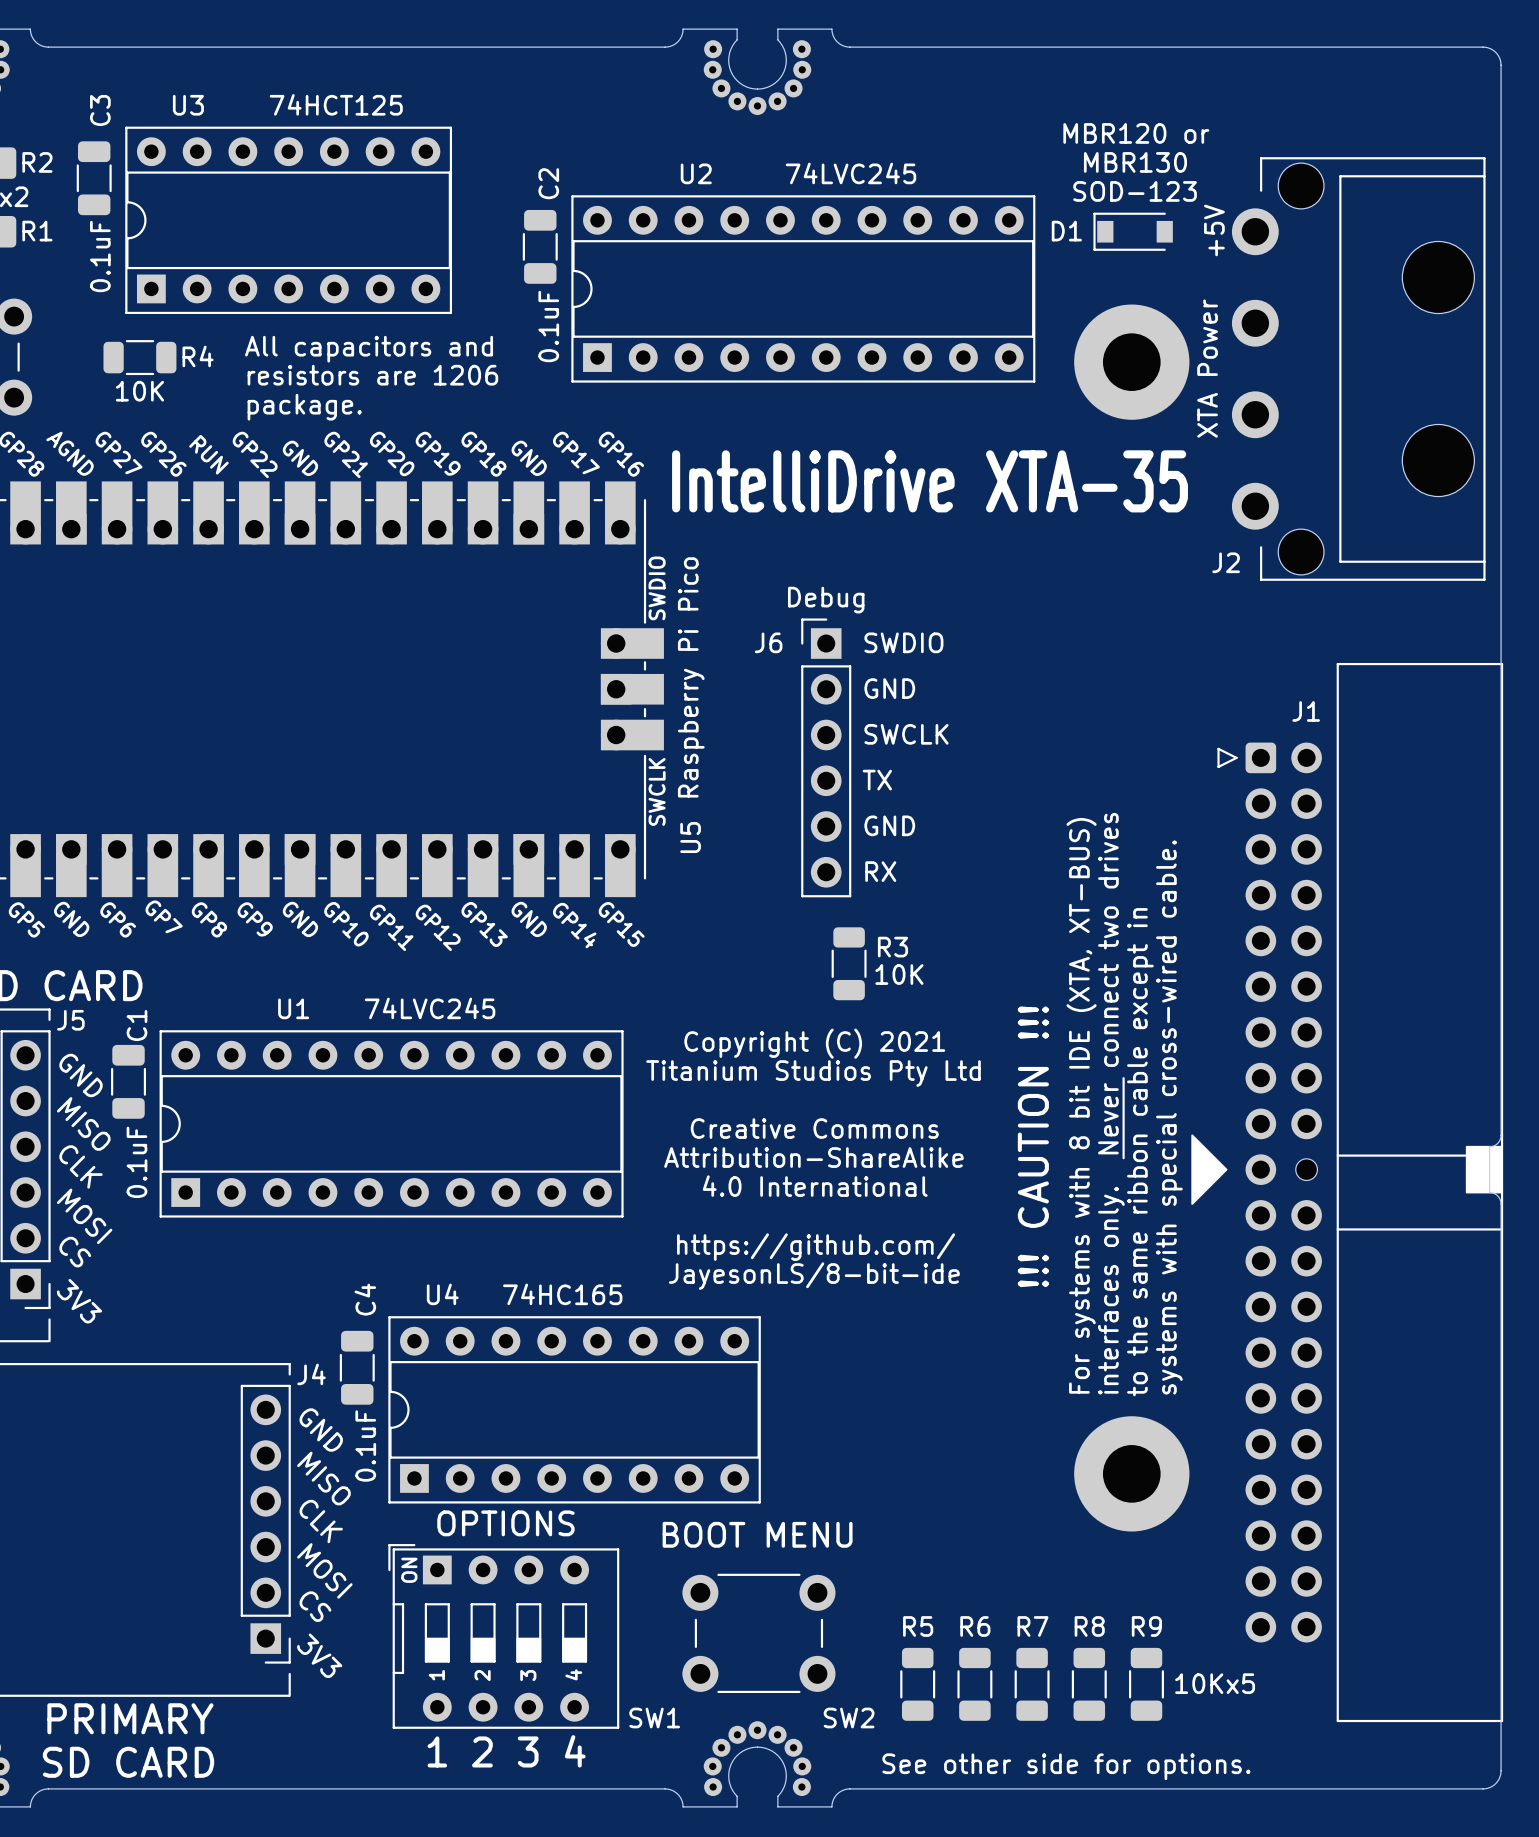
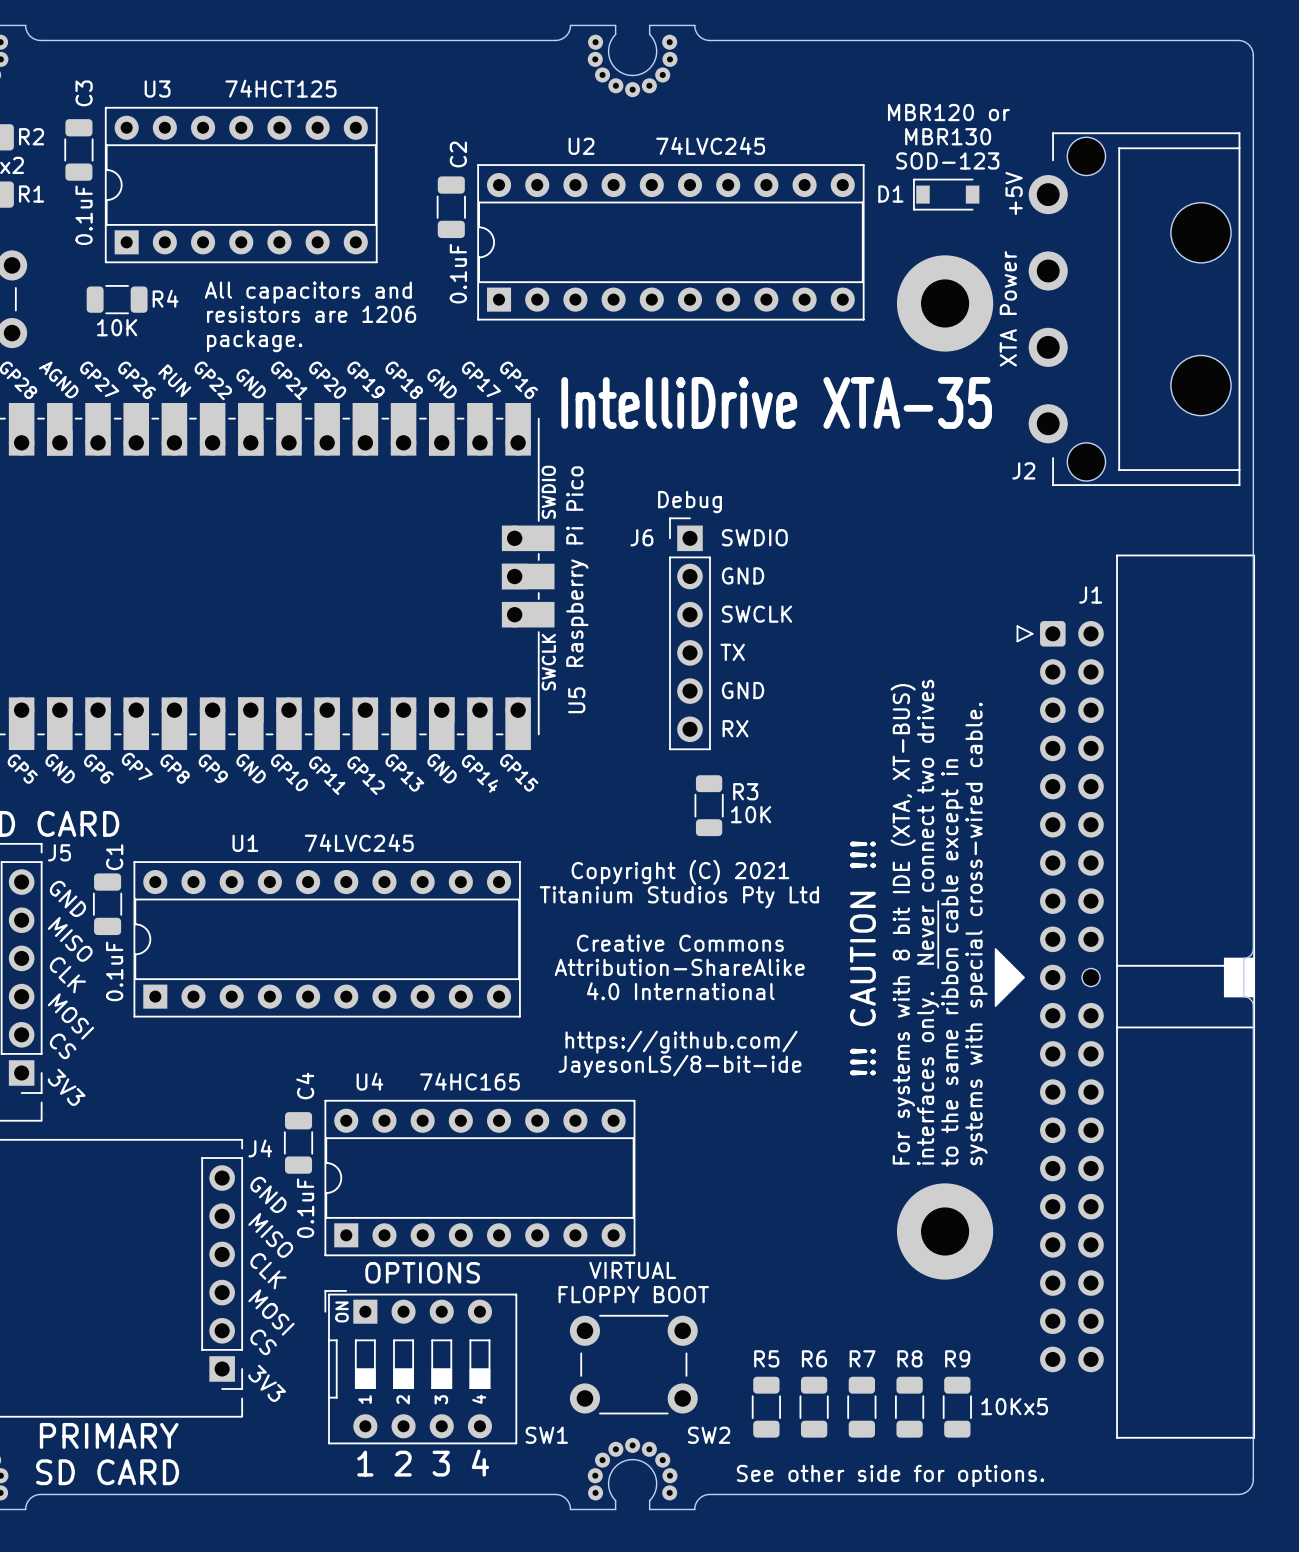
text: none -> VIRTUAL (632, 1270)
text: BOOT MENU (757, 1534) -> none
text: none -> FLOPPY BOOT (633, 1294)

